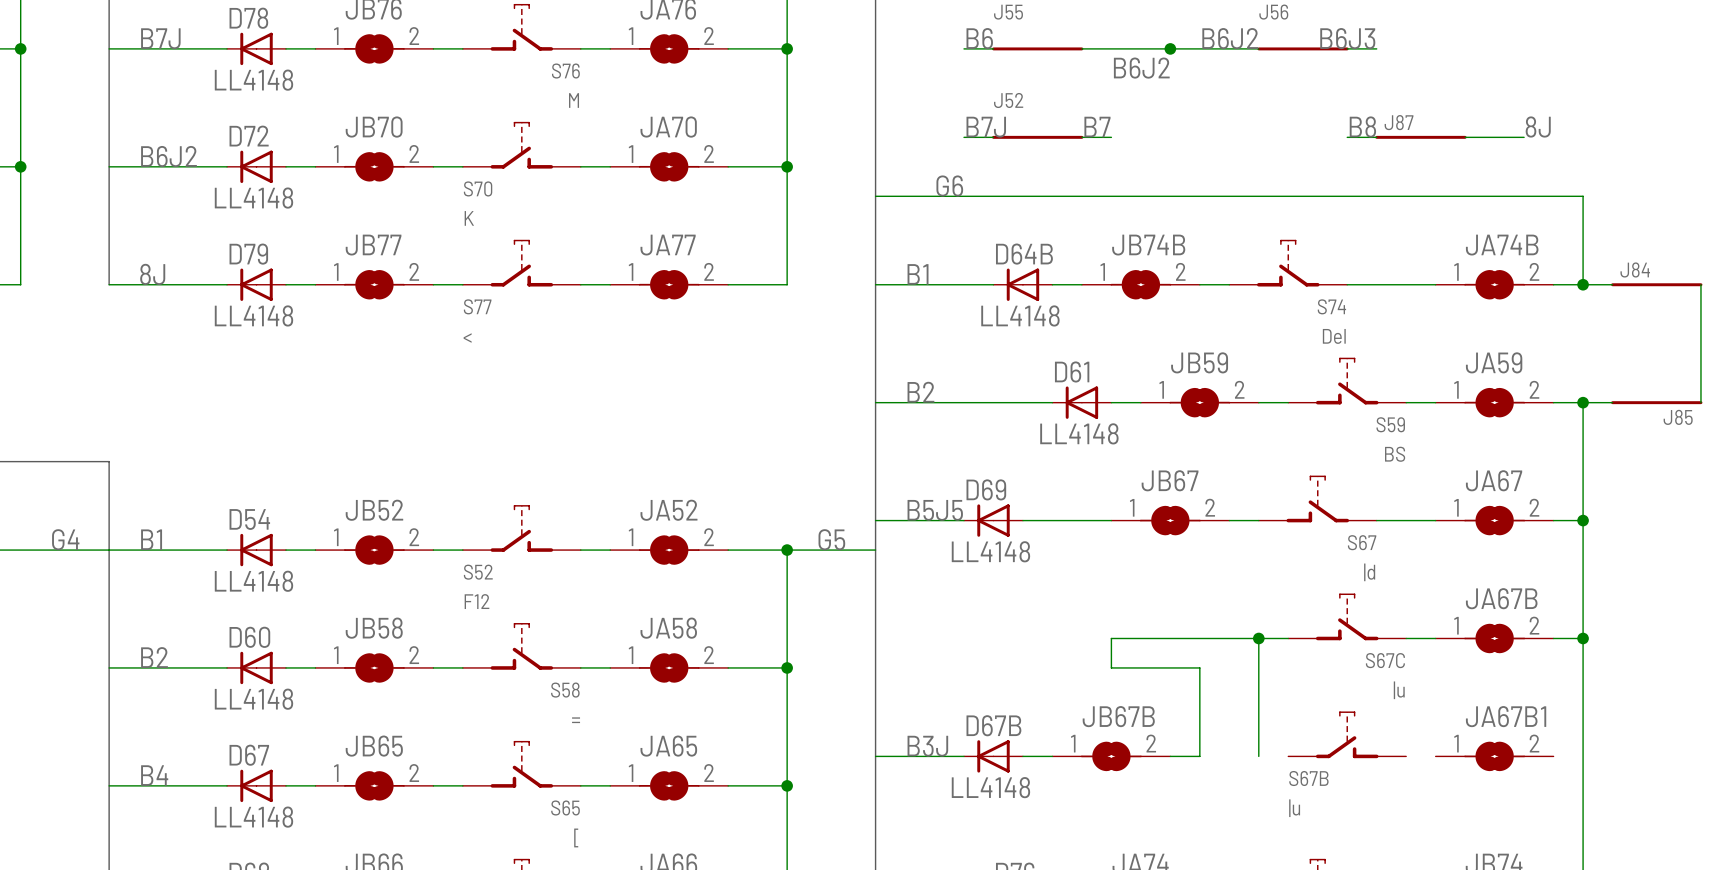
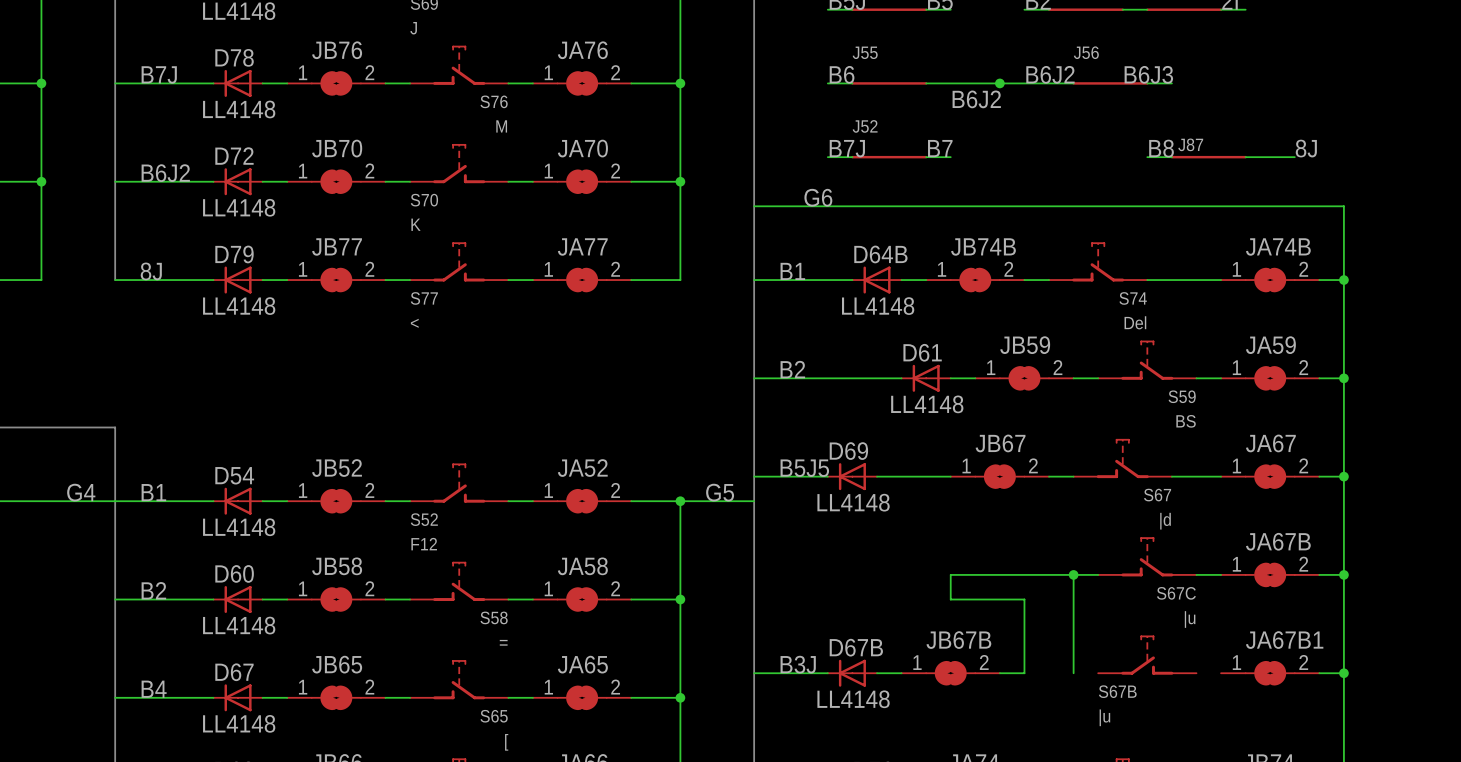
wire: (1583, 284) (1612, 284) -> (1343, 280) (1343, 378)
J84: (1656, 284) -> none
wire: (1700, 284) (1700, 402) -> none
wire: (1583, 402) (1612, 402) -> none
J85: (1656, 402) -> none
wire: none -> (1319, 673) (1343, 673)
junction: none -> (1343, 673)

